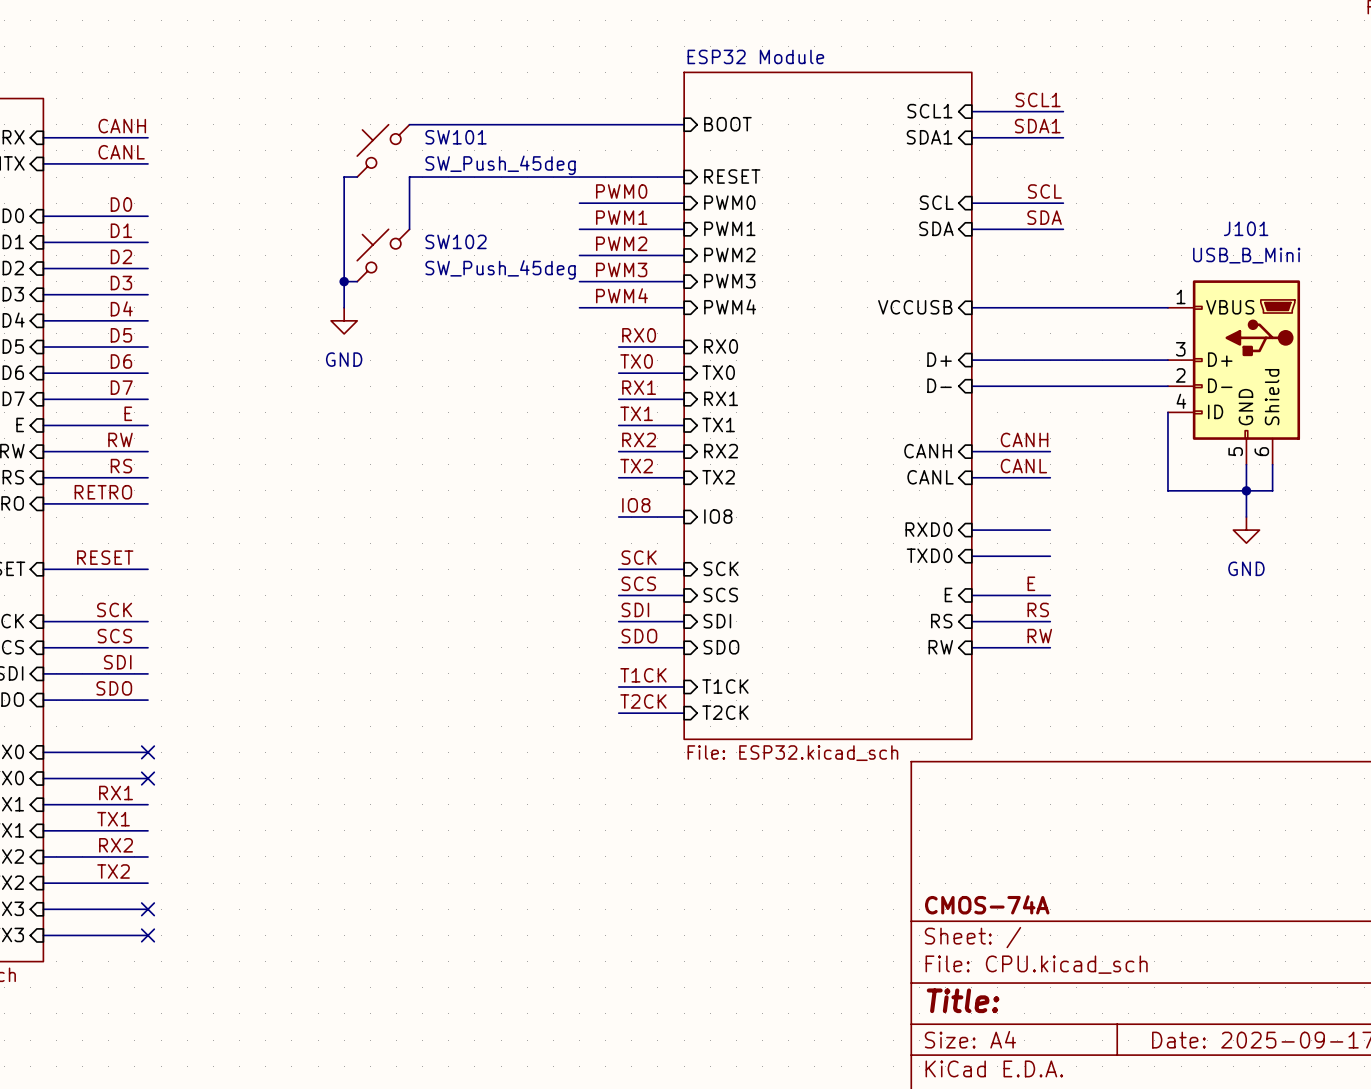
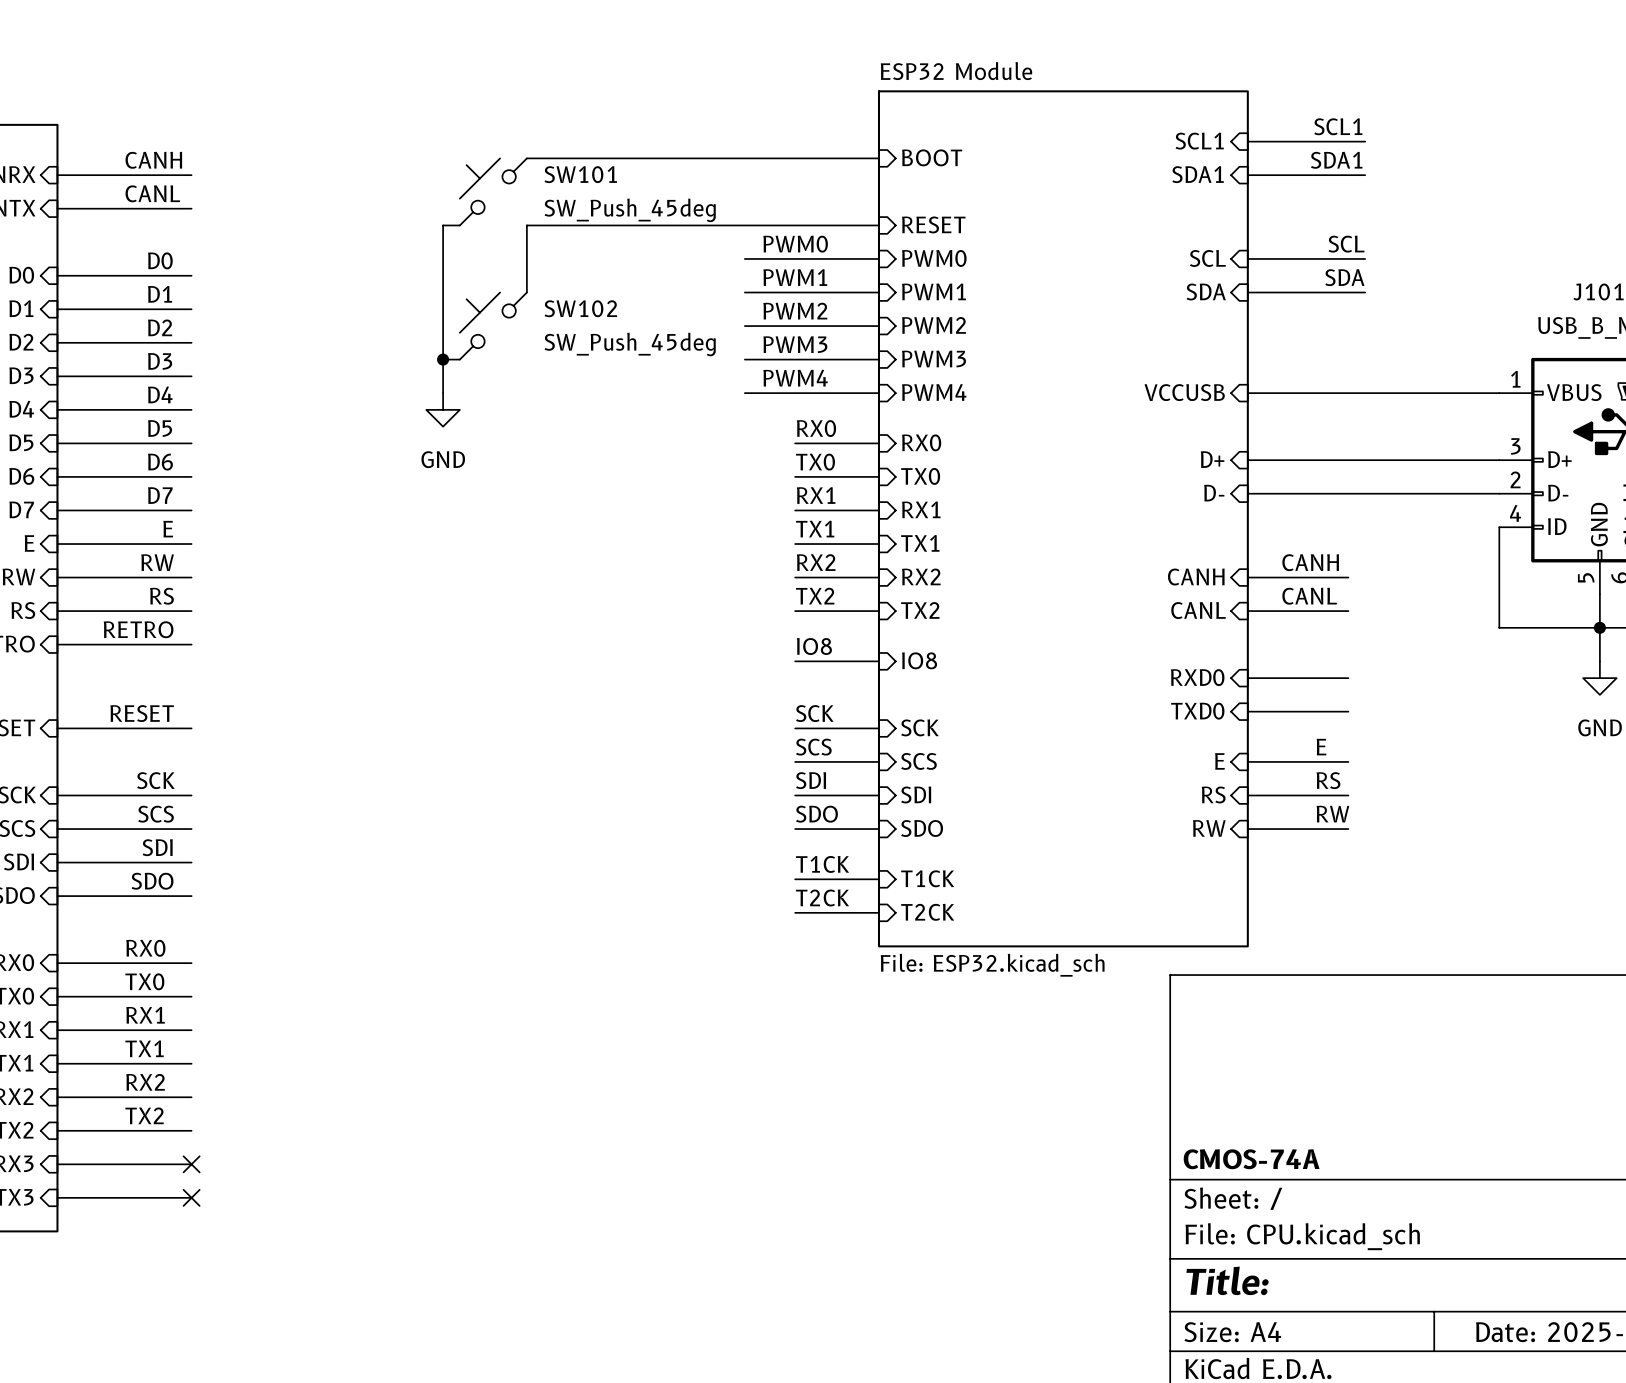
label: none -> RX0 (145, 948)
no-connect mark: (148, 752) -> none
label: none -> TX0 (144, 981)
no-connect mark: (148, 778) -> none

